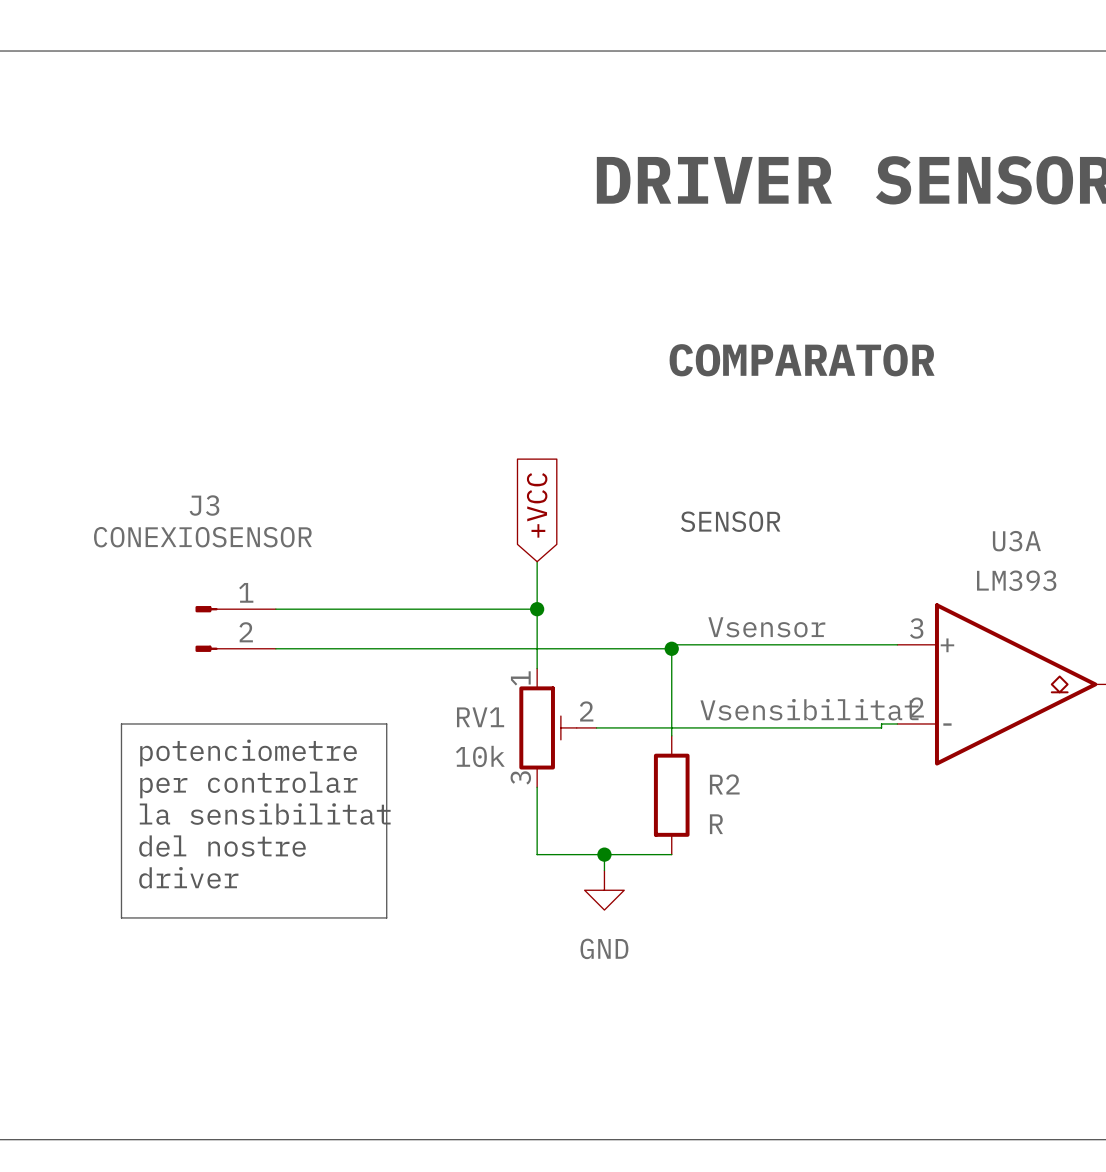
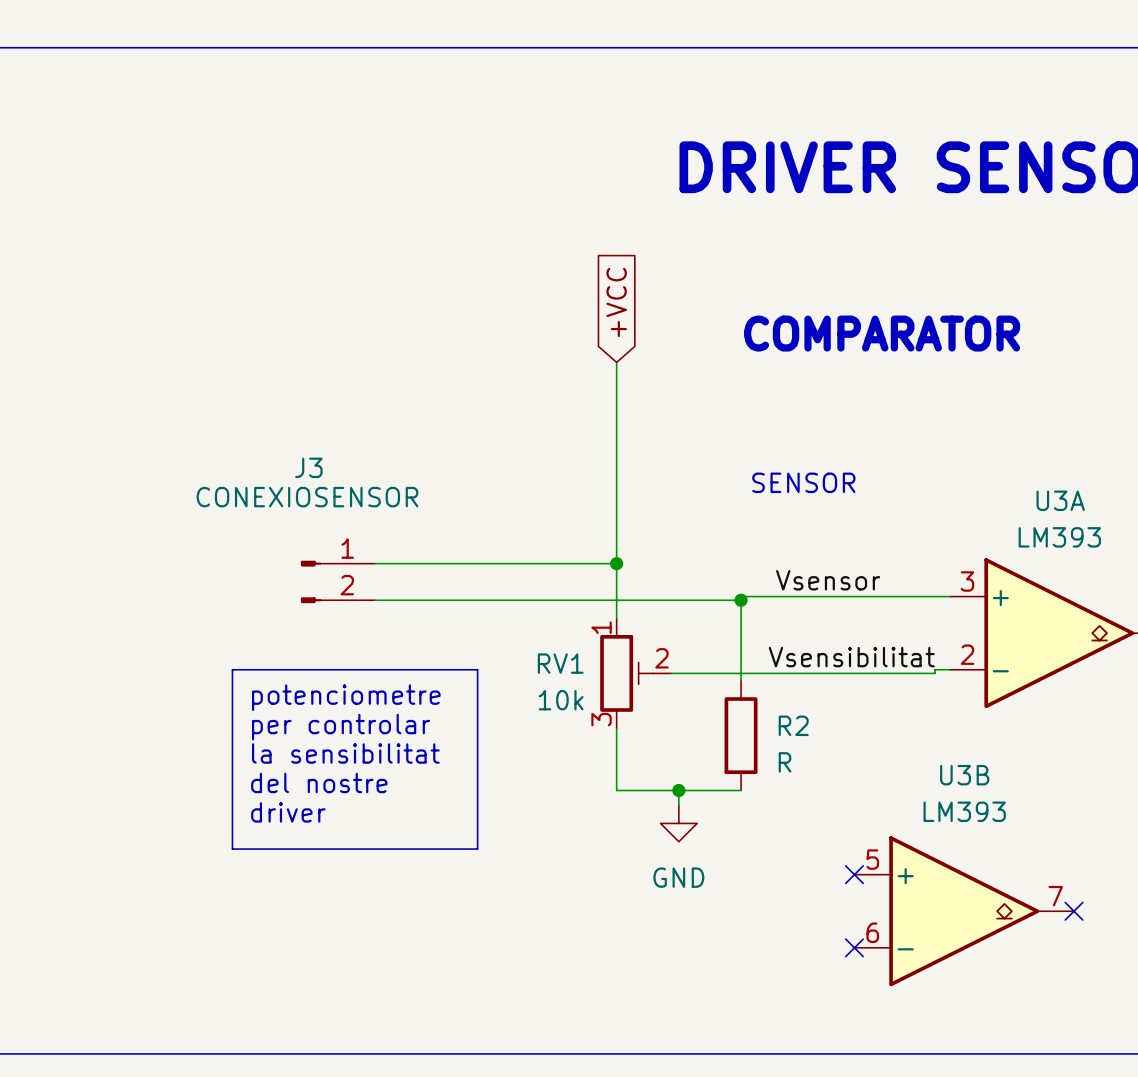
wire: none -> (616, 362) (616, 519)
global label position: +VCC (537, 505) -> +VCC (616, 302)
no-connect mark: none -> (854, 874)
U3B: none -> LM393 (964, 911)
no-connect mark: none -> (1074, 911)
no-connect mark: none -> (854, 947)

